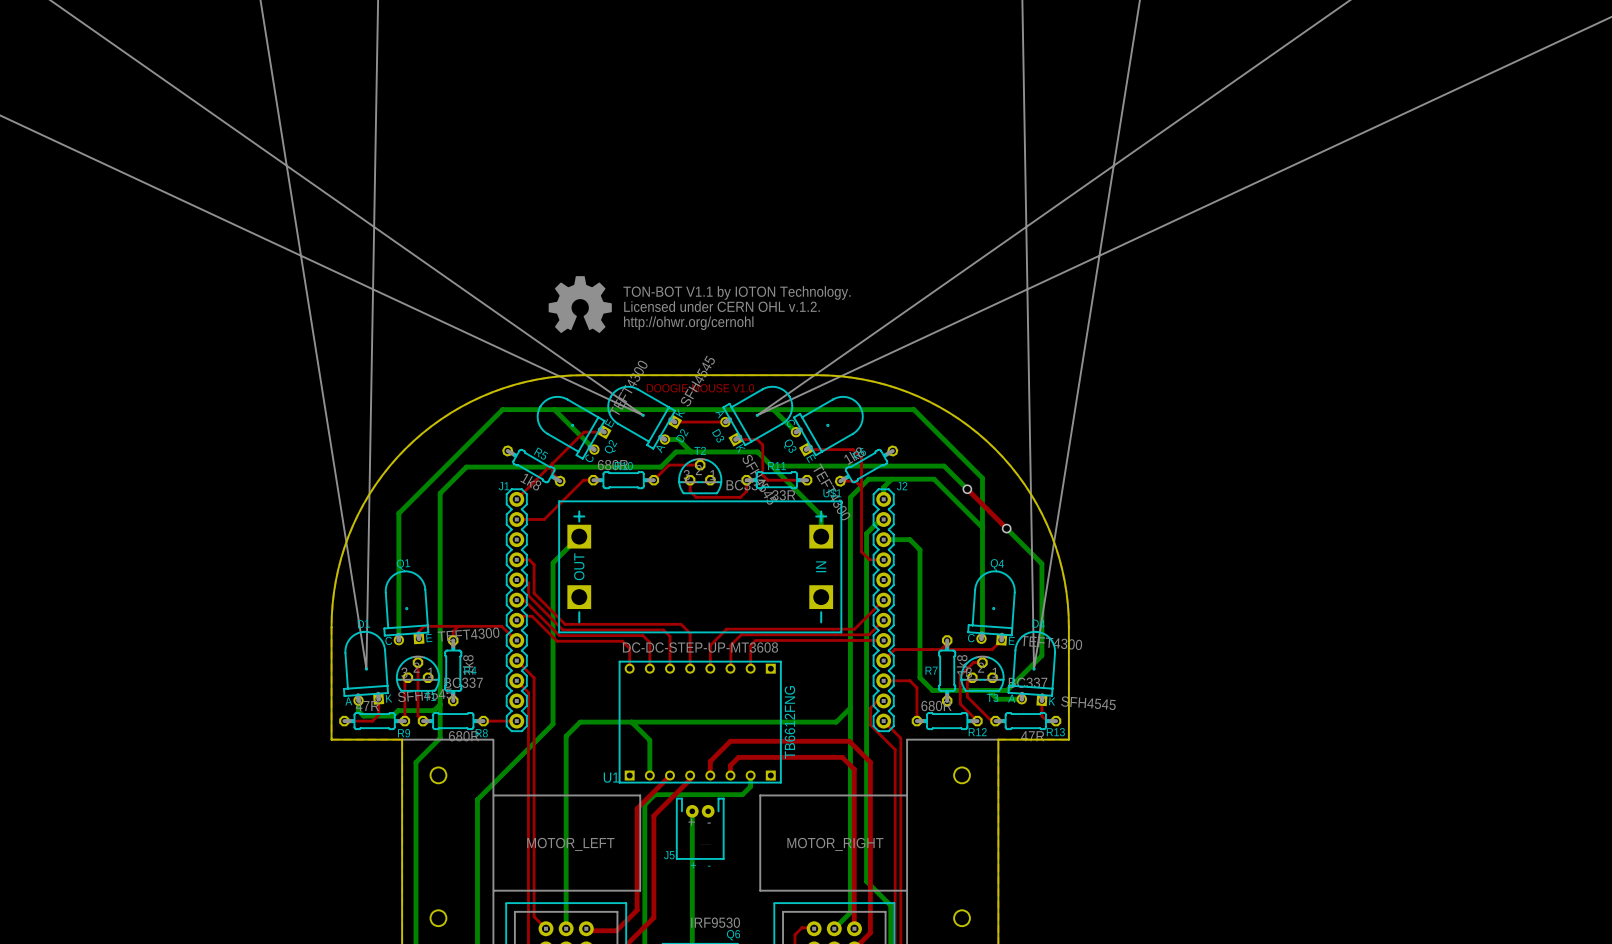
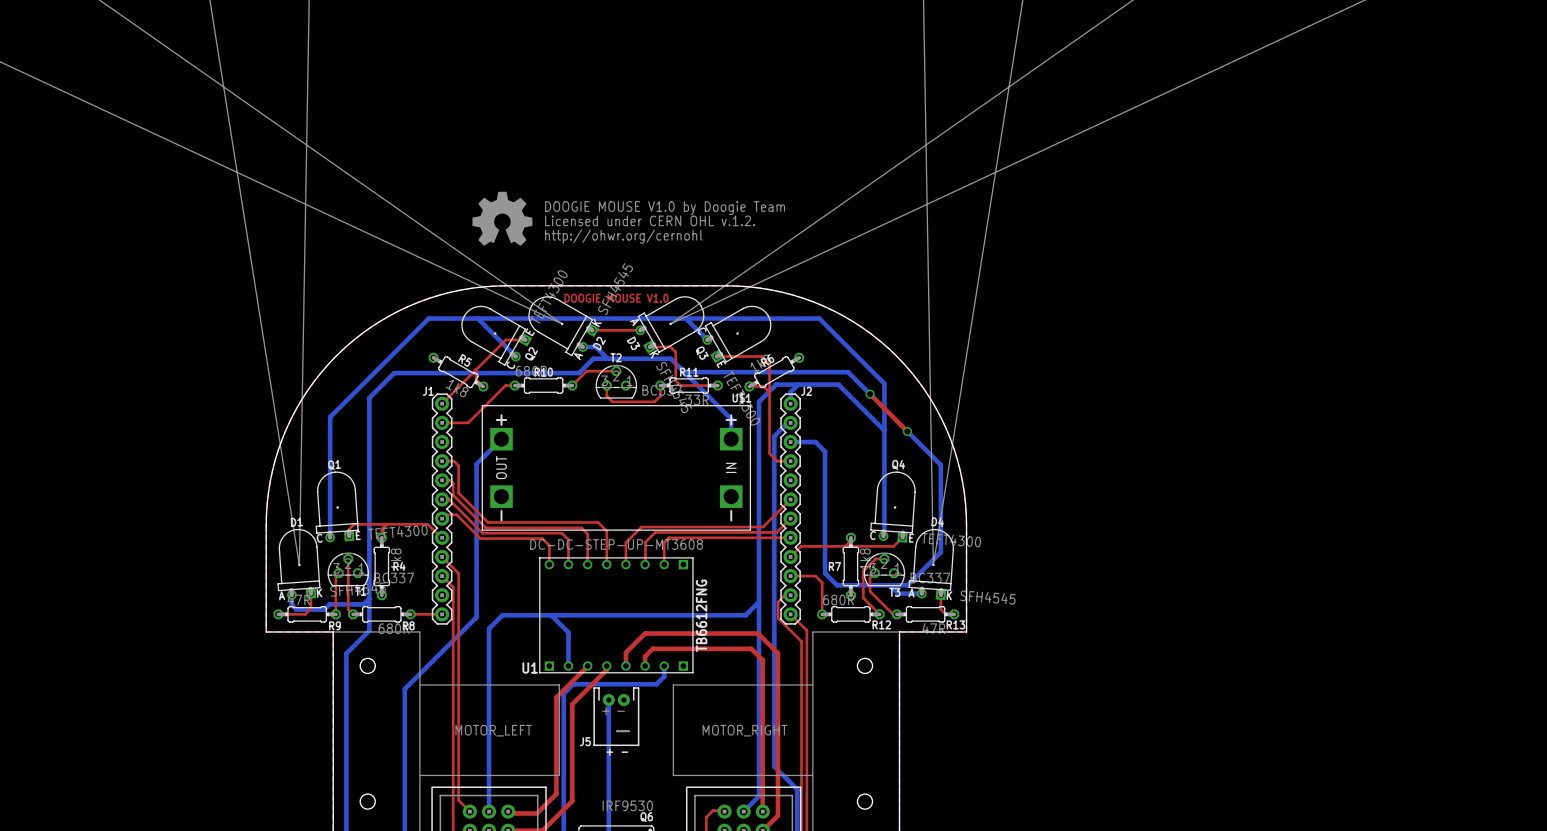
text: TON-BOT V1.1 by IOTON Technology. (736, 292) -> DOOGIE MOUSE V1.0 by Doogie Team (665, 208)

